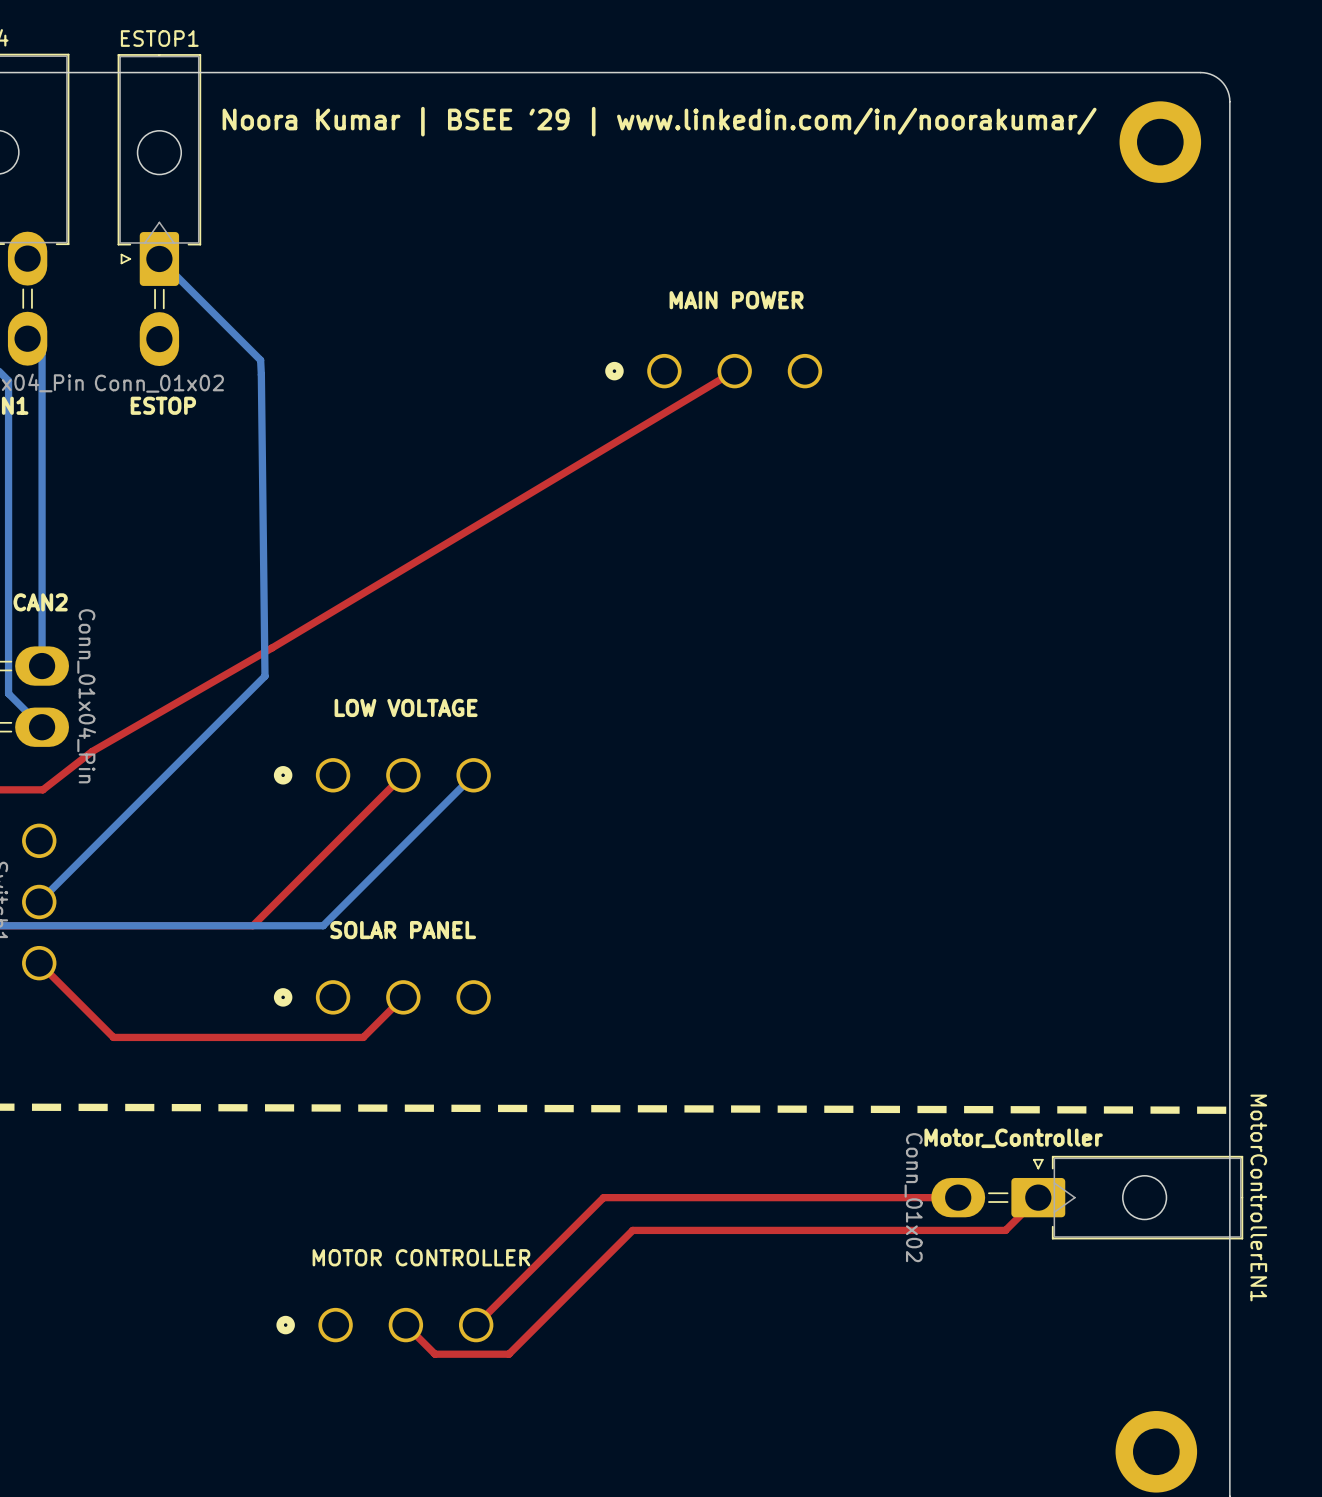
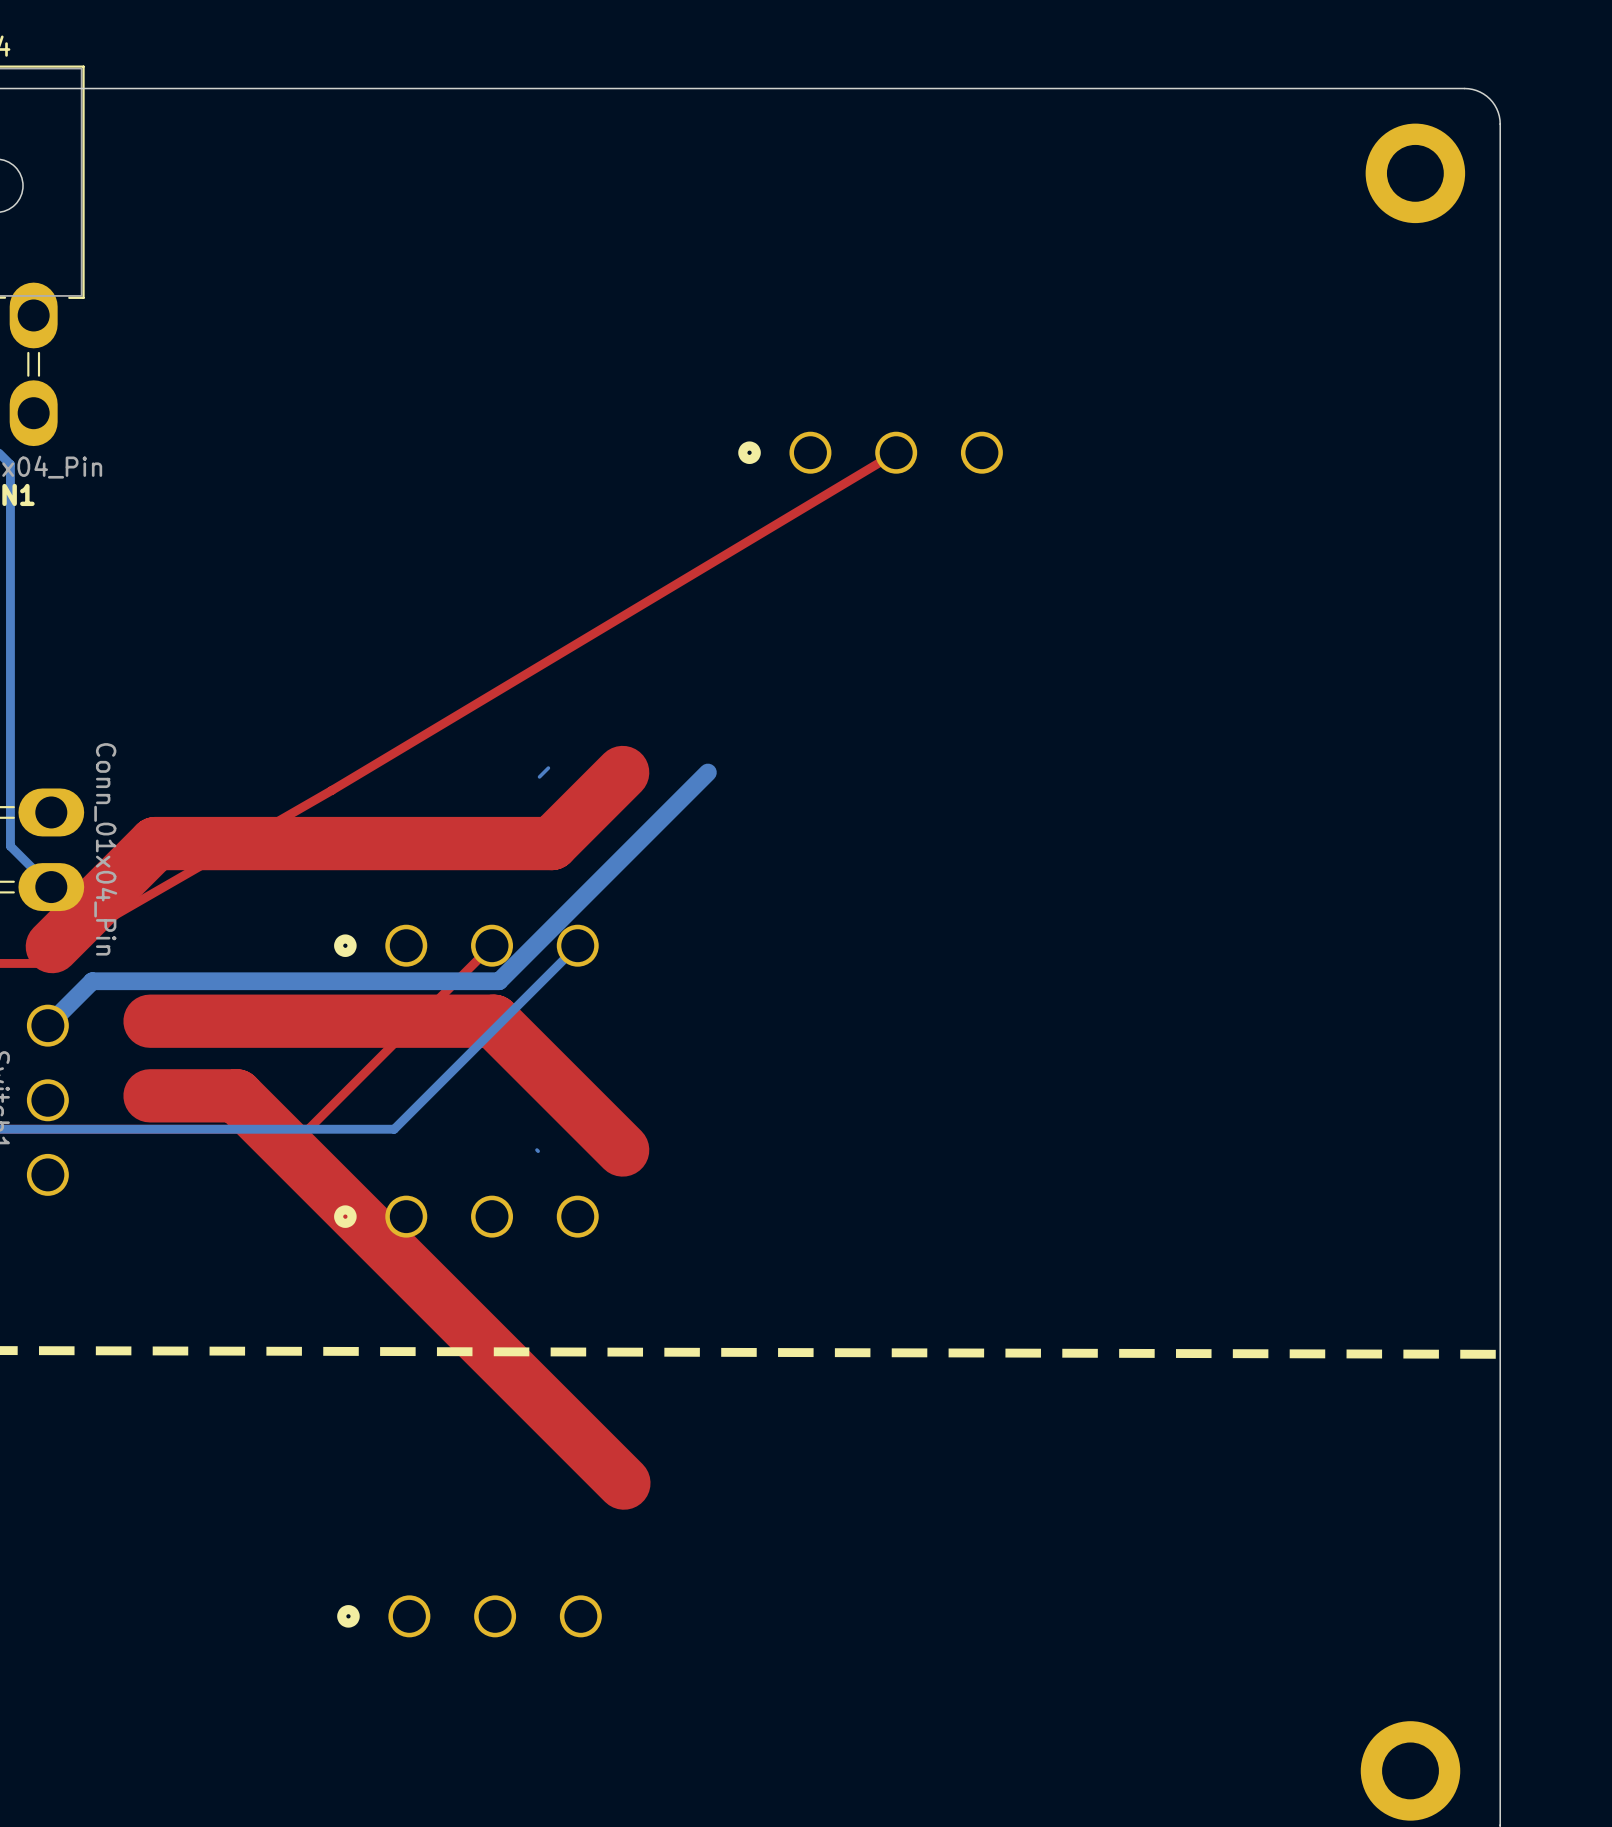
text: Noora Kumar | BSEE '29 | www.linkedin.com/in/noorakumar/ (659, 121) -> none
ESTOP1: Conn_01x02 (159, 210) -> none
bottom track: (159, 258) (260, 360) (264, 676) (39, 901) -> none
text: MAIN POWER (736, 300) -> none
bottom track: (27, 338) (42, 353) (42, 666) -> none
text: ESTOP (163, 405) -> none
text: CAN2 (40, 602) -> none
bottom track: none -> (548, 768) (539, 776)
top track: none -> (622, 772) (551, 843) (155, 843) (52, 946)
bottom track: none -> (707, 772) (499, 981) (92, 981) (52, 1021)
text: LOW VOLTAGE (406, 707) -> none
top track: none -> (150, 1021) (493, 1021) (622, 1150)
top track: none -> (150, 1095) (236, 1095) (623, 1483)
text: SOLAR PANEL (403, 930) -> none
bottom track: none -> (536, 1150) (538, 1151)
top track: (39, 963) (113, 1037) (363, 1037) (403, 997) -> none
text: Motor_Controller (1013, 1138) -> none
top track: (958, 1197) (603, 1197) (476, 1325) -> none
top track: (1038, 1197) (1005, 1230) (632, 1230) (508, 1354) (435, 1354) (405, 1325) -> none
MotorControllerEN1: Conn_01x02 (1087, 1197) -> none
text: MOTOR CONTROLLER (421, 1257) -> none

